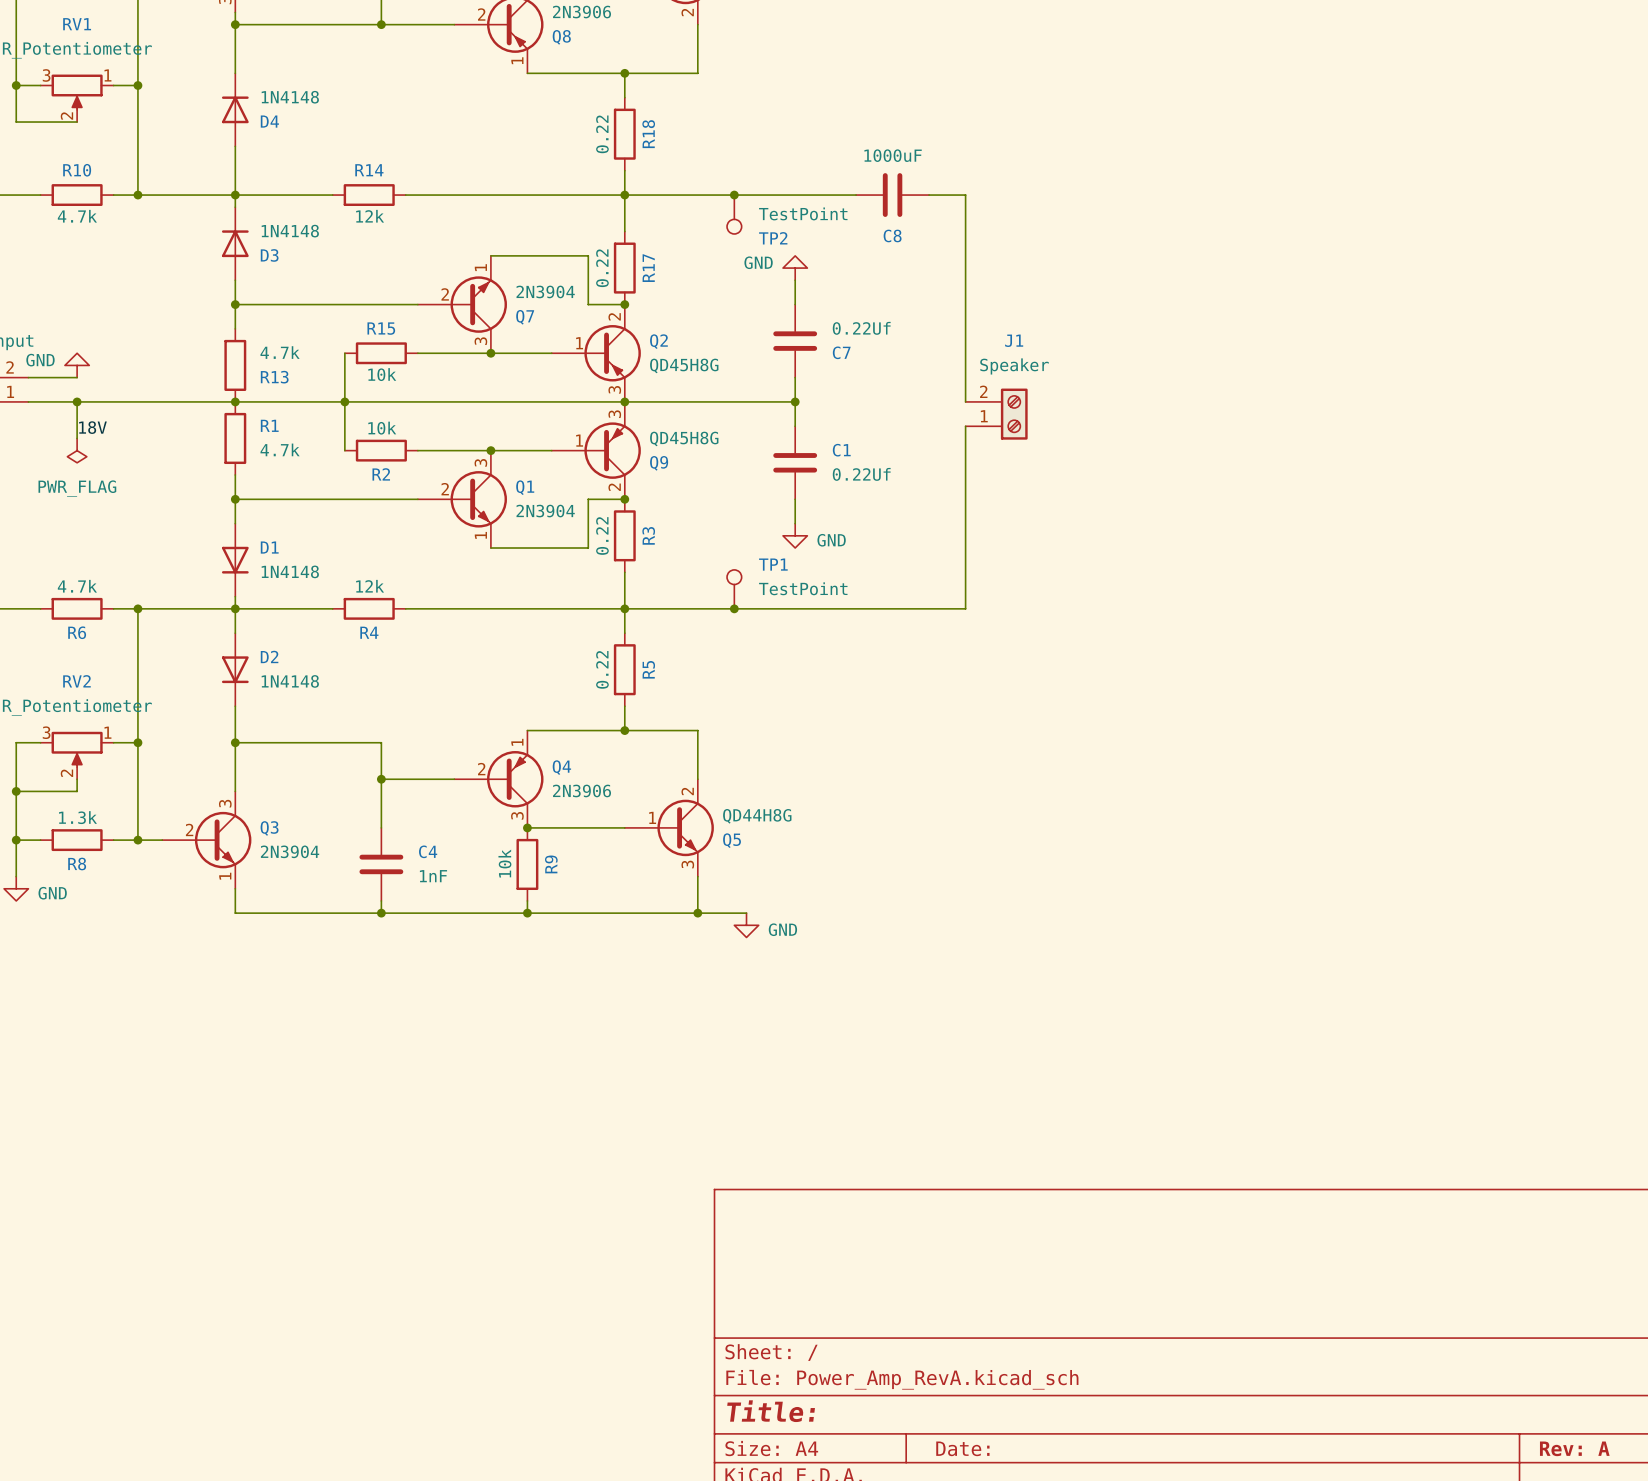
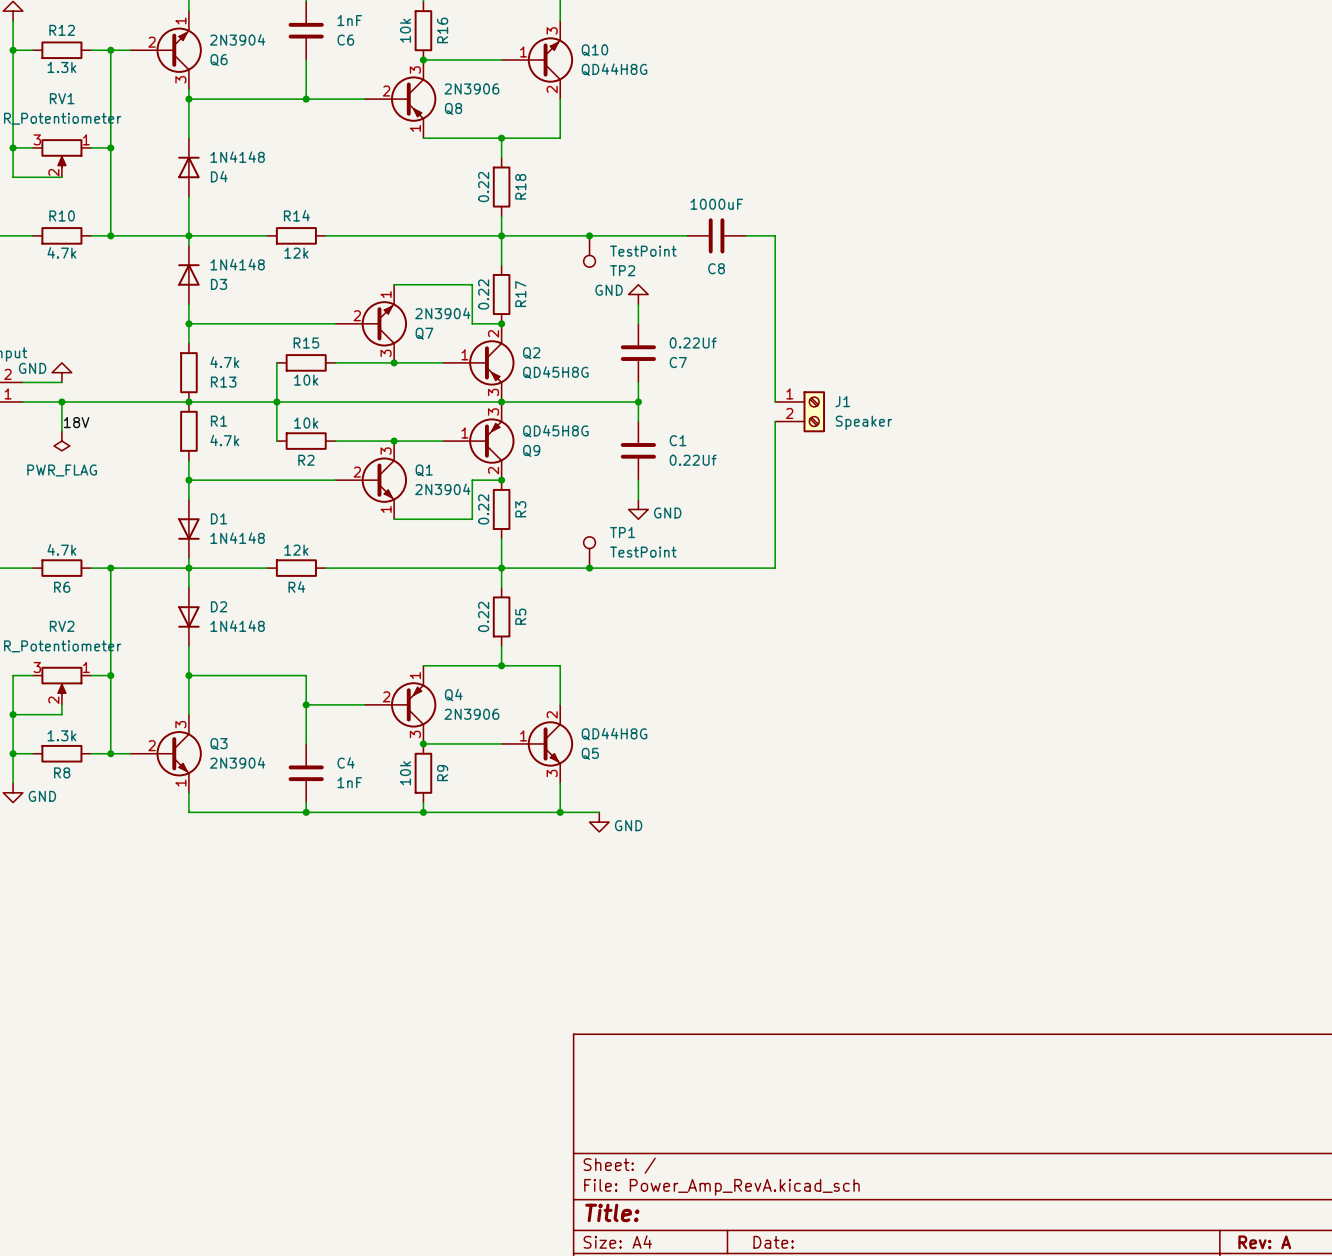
J1 name position: J1 (1014, 340) -> J1 (842, 401)
J1 value position: Speaker (1014, 366) -> Speaker (863, 422)
J1 flip: as is (1014, 414) -> up-down (814, 411)

